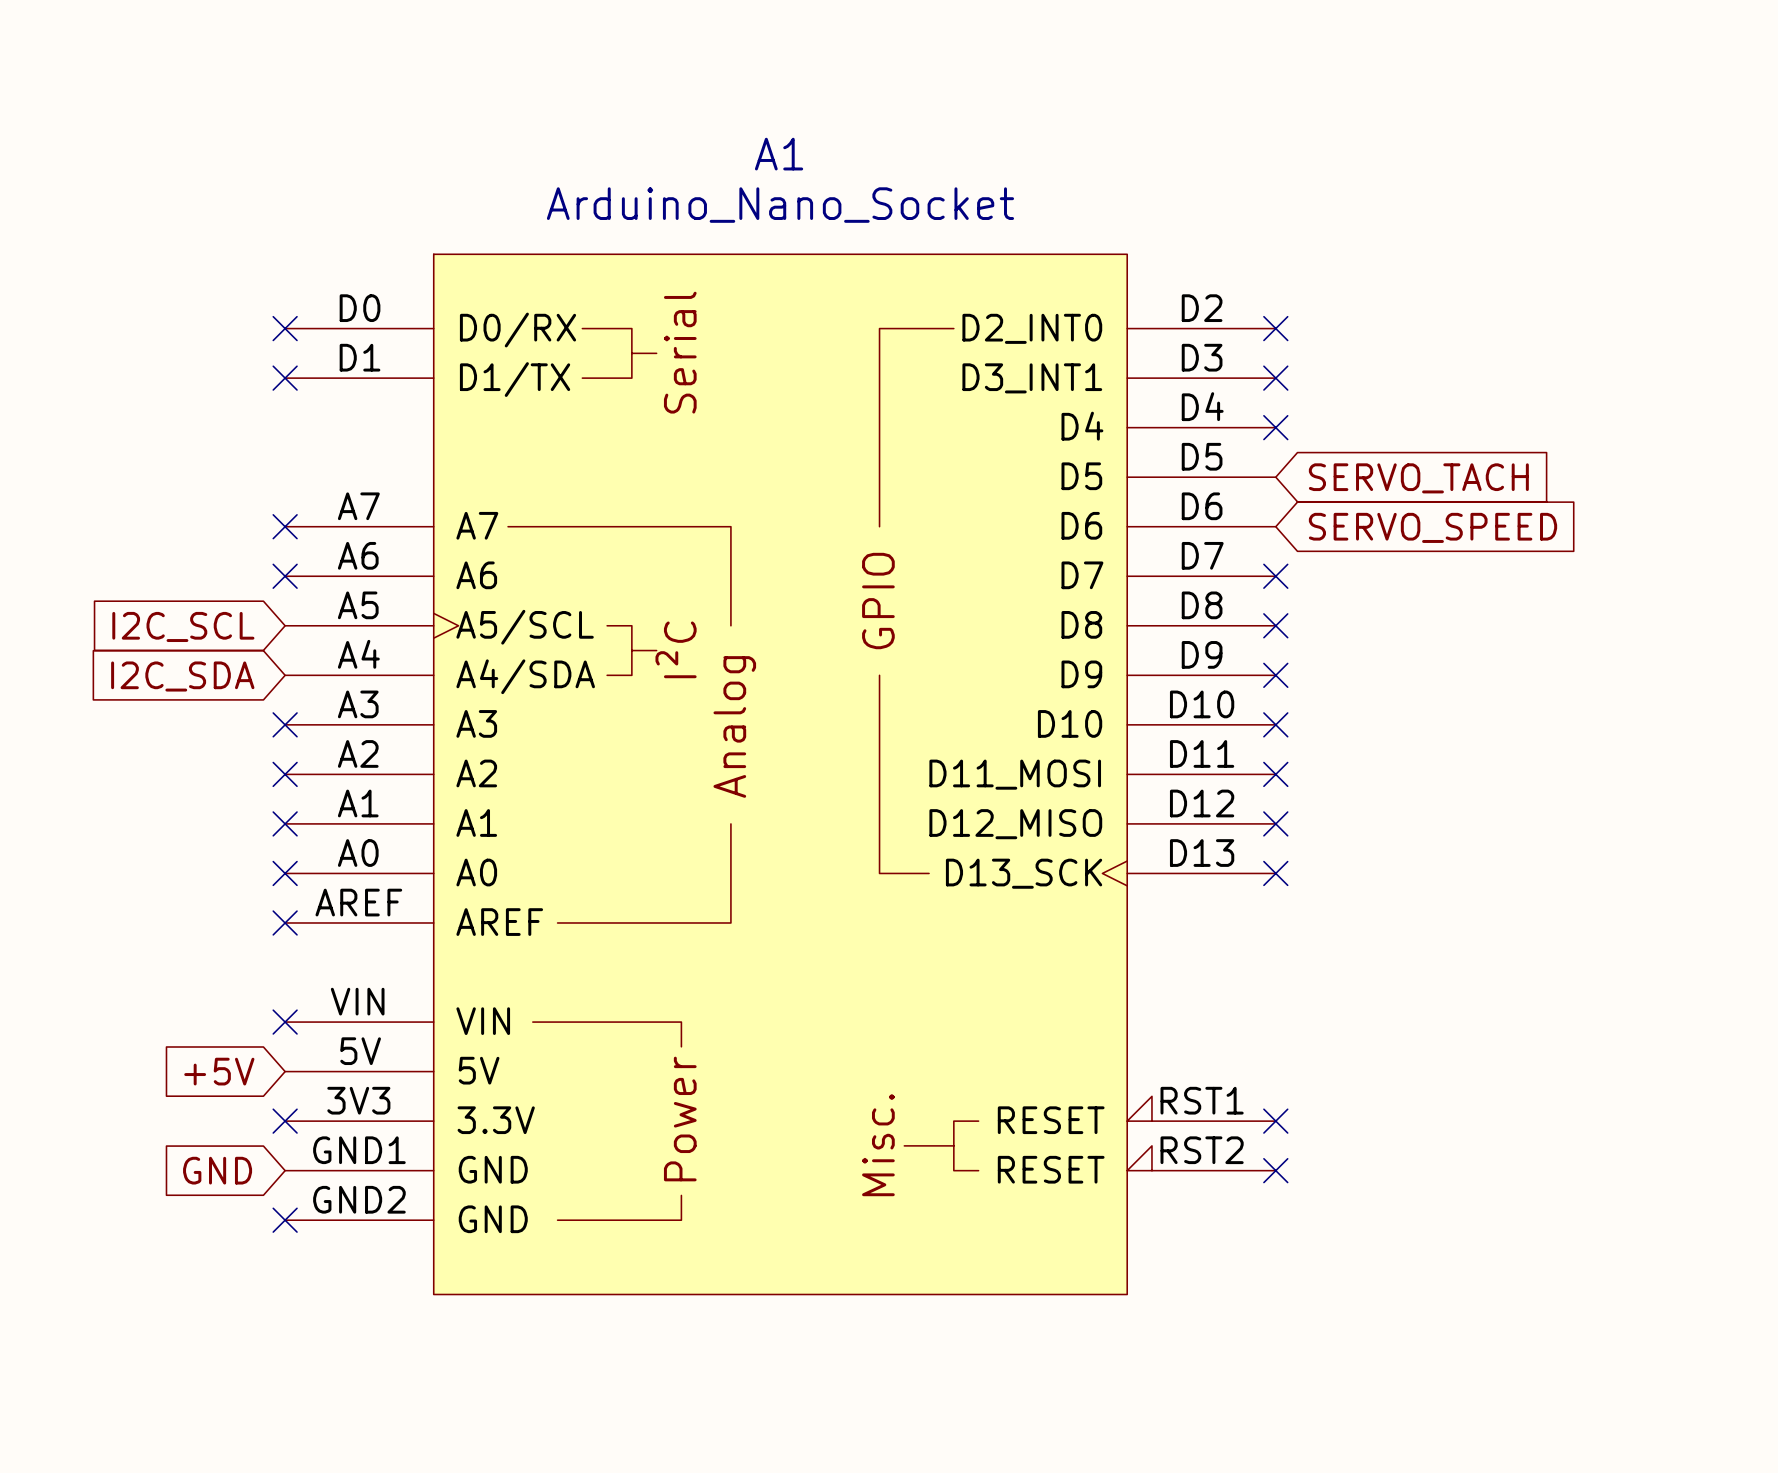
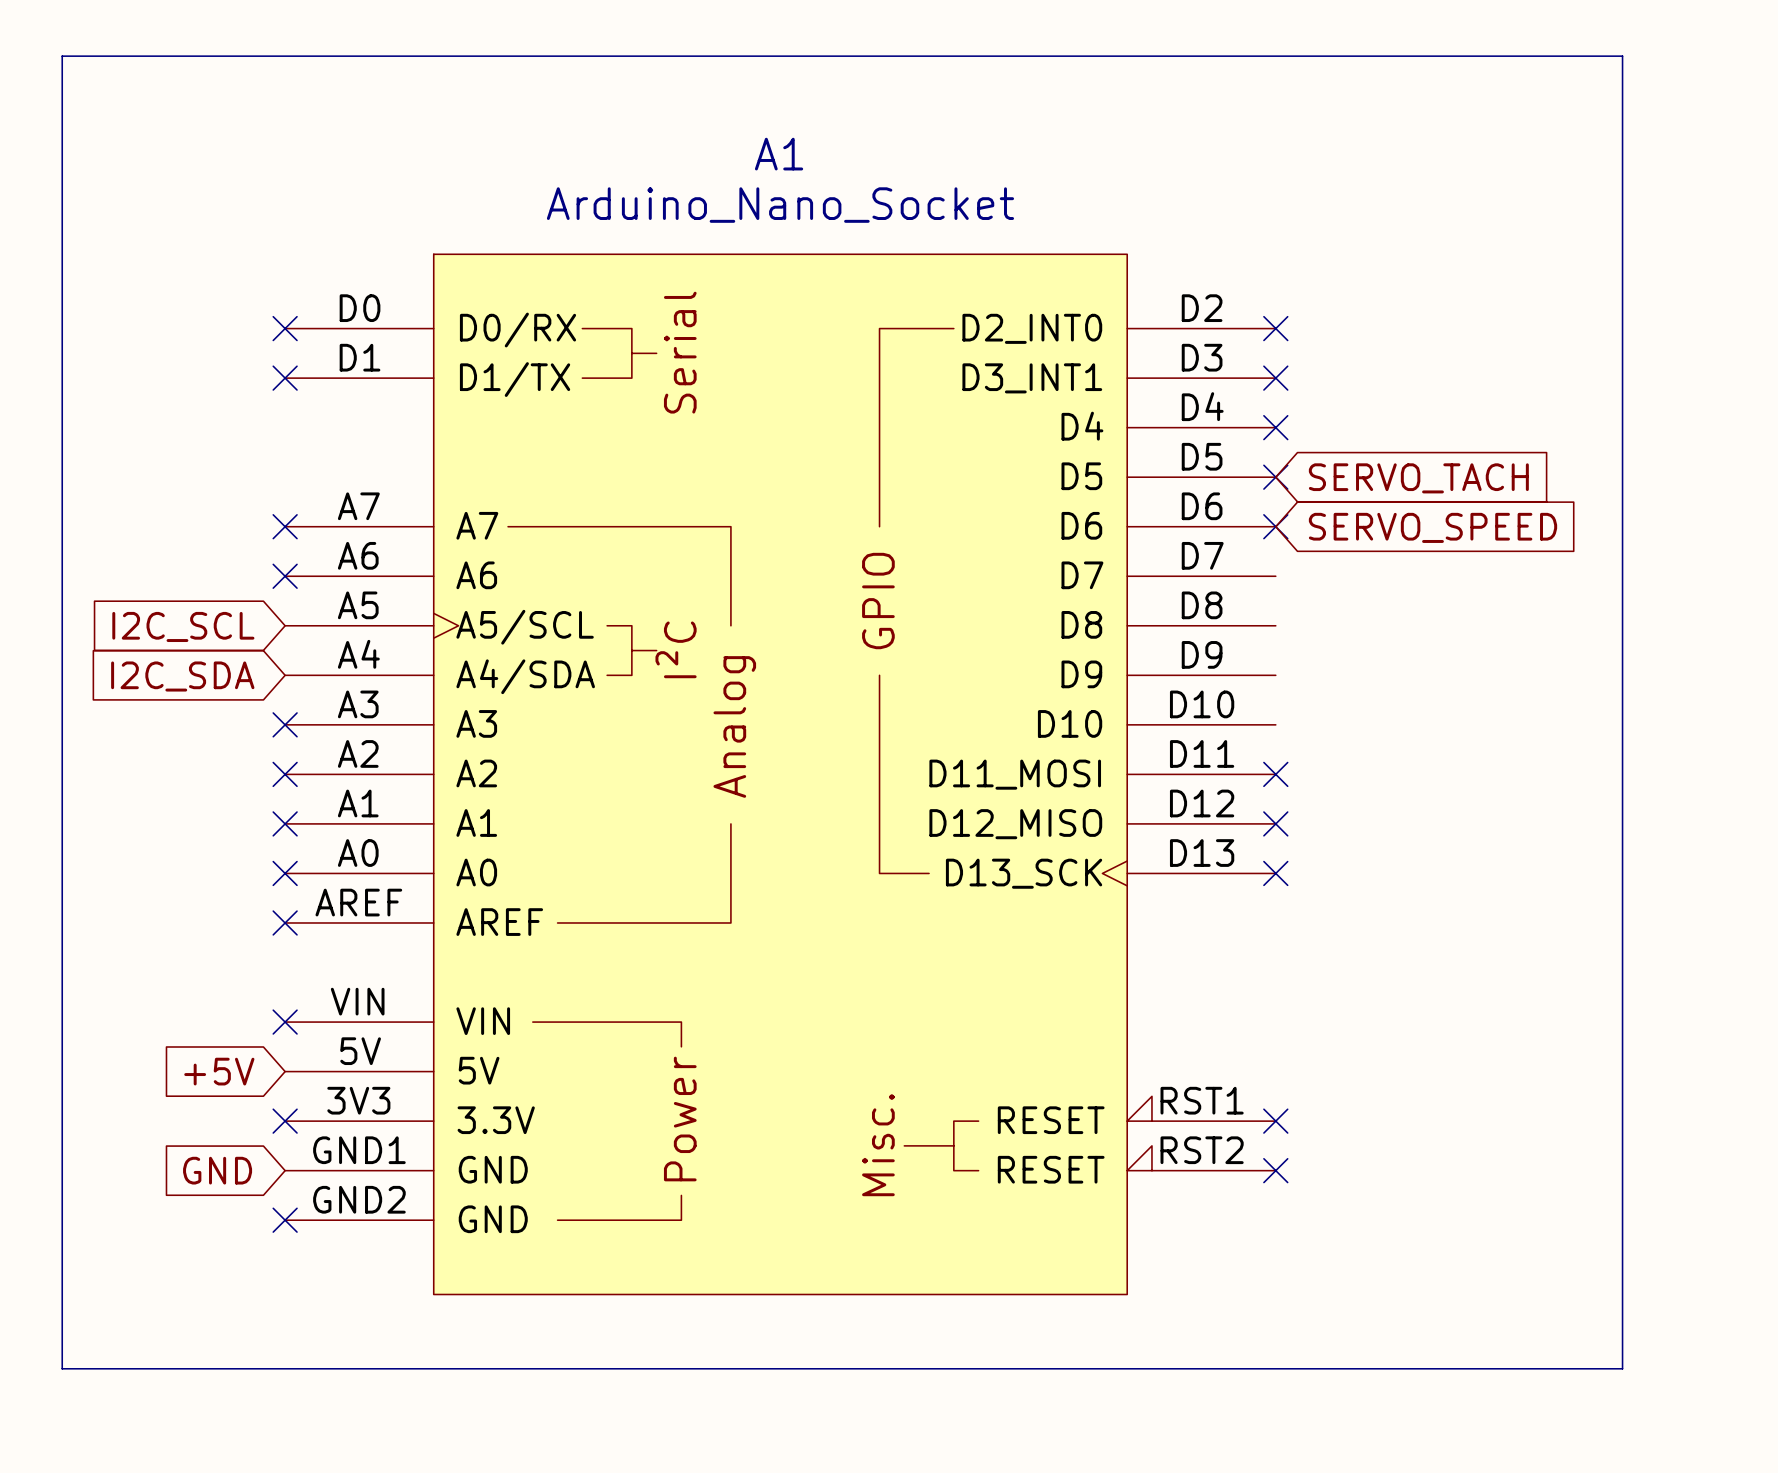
line: none -> (62, 56) (1622, 56) (1622, 1368) (62, 1368) (62, 56)
no-connect mark: none -> (1275, 477)
no-connect mark: none -> (1275, 526)
no-connect mark: (1275, 576) -> none
no-connect mark: (1275, 625) -> none
no-connect mark: (1275, 675) -> none
no-connect mark: (1275, 724) -> none

